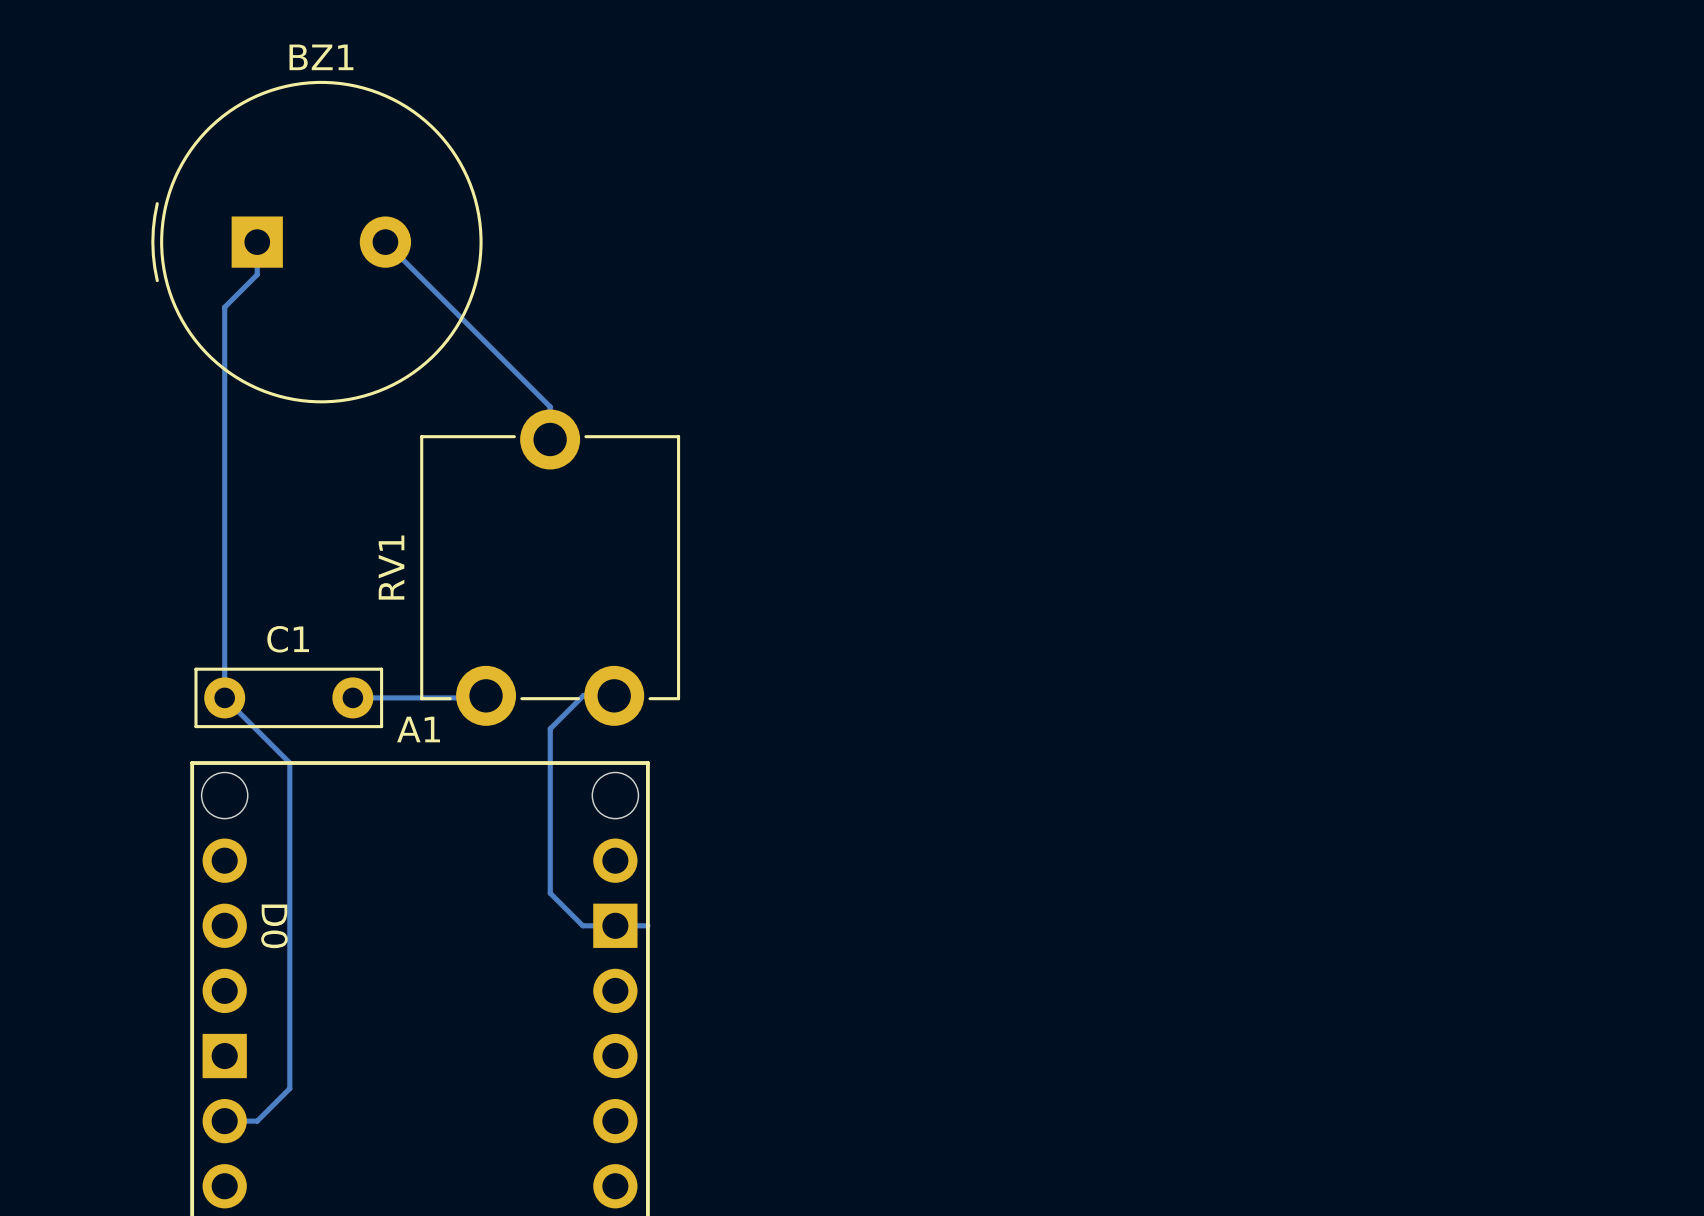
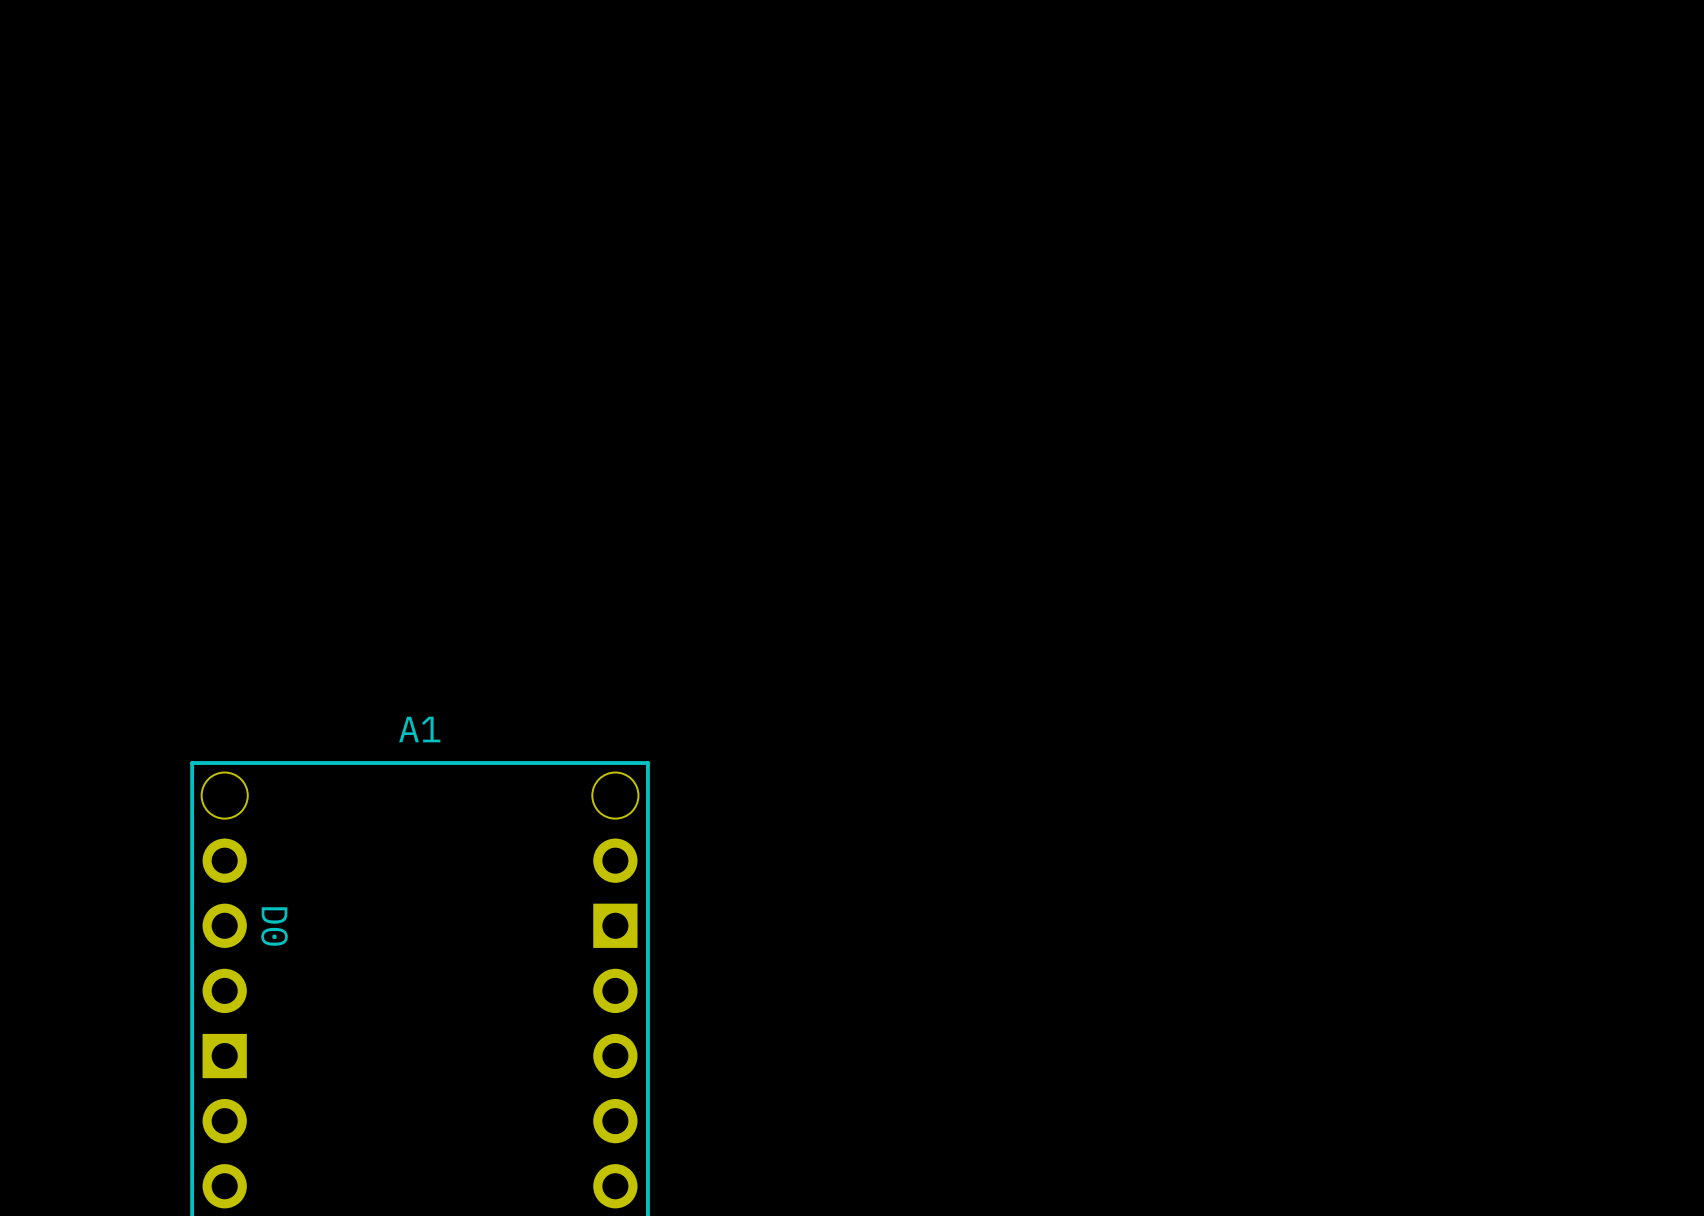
bottom track: (257, 242) (257, 274) (224, 307) (224, 697) (289, 763) (289, 1088) (257, 1121) (224, 1121) -> none
BZ1: (316, 242) -> none
bottom track: (385, 242) (550, 406) (550, 439) -> none
RV1: (550, 567) -> none
bottom track: (486, 695) (484, 697) (352, 697) -> none
bottom track: (614, 695) (583, 695) (550, 728) (550, 893) (582, 925) (647, 925) -> none
C1: (288, 697) -> none

